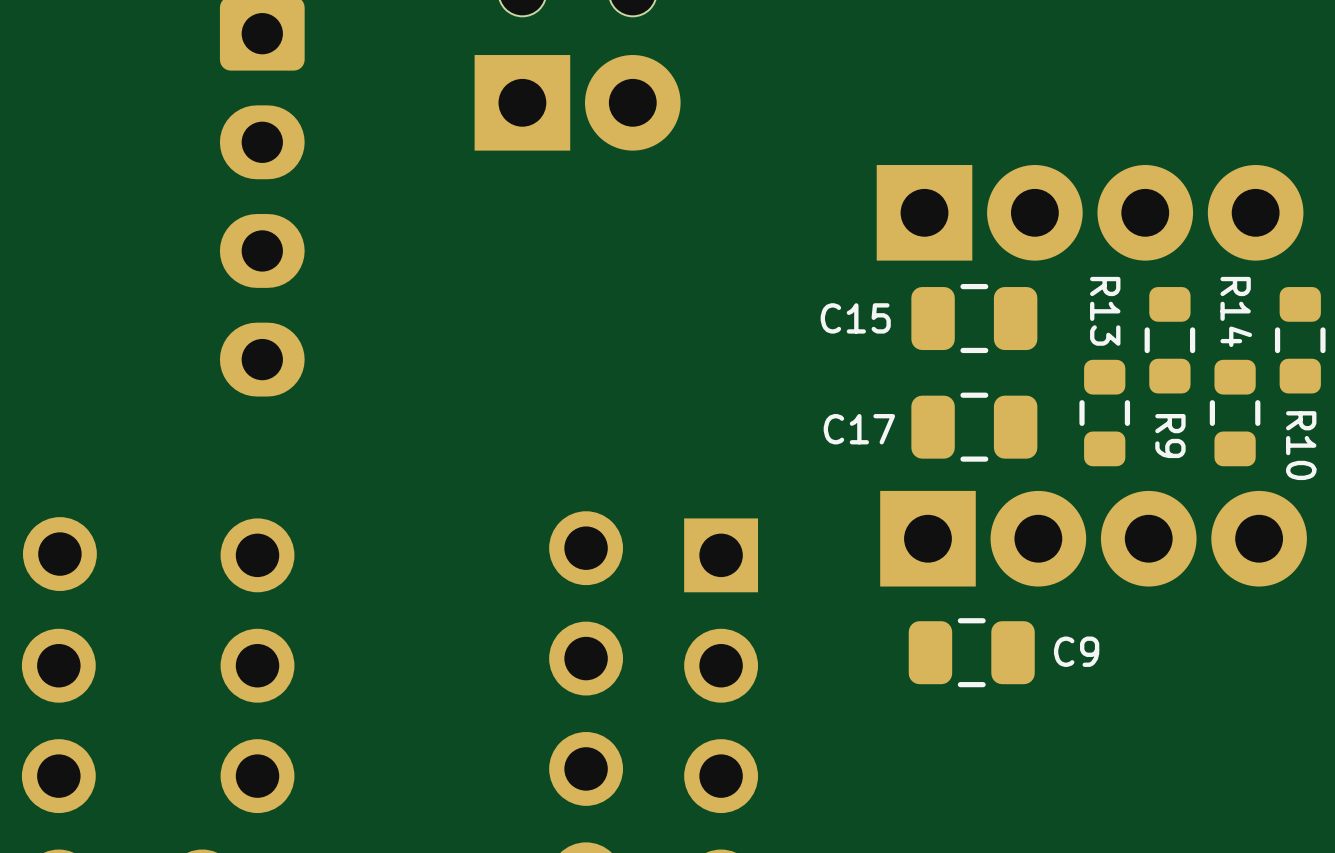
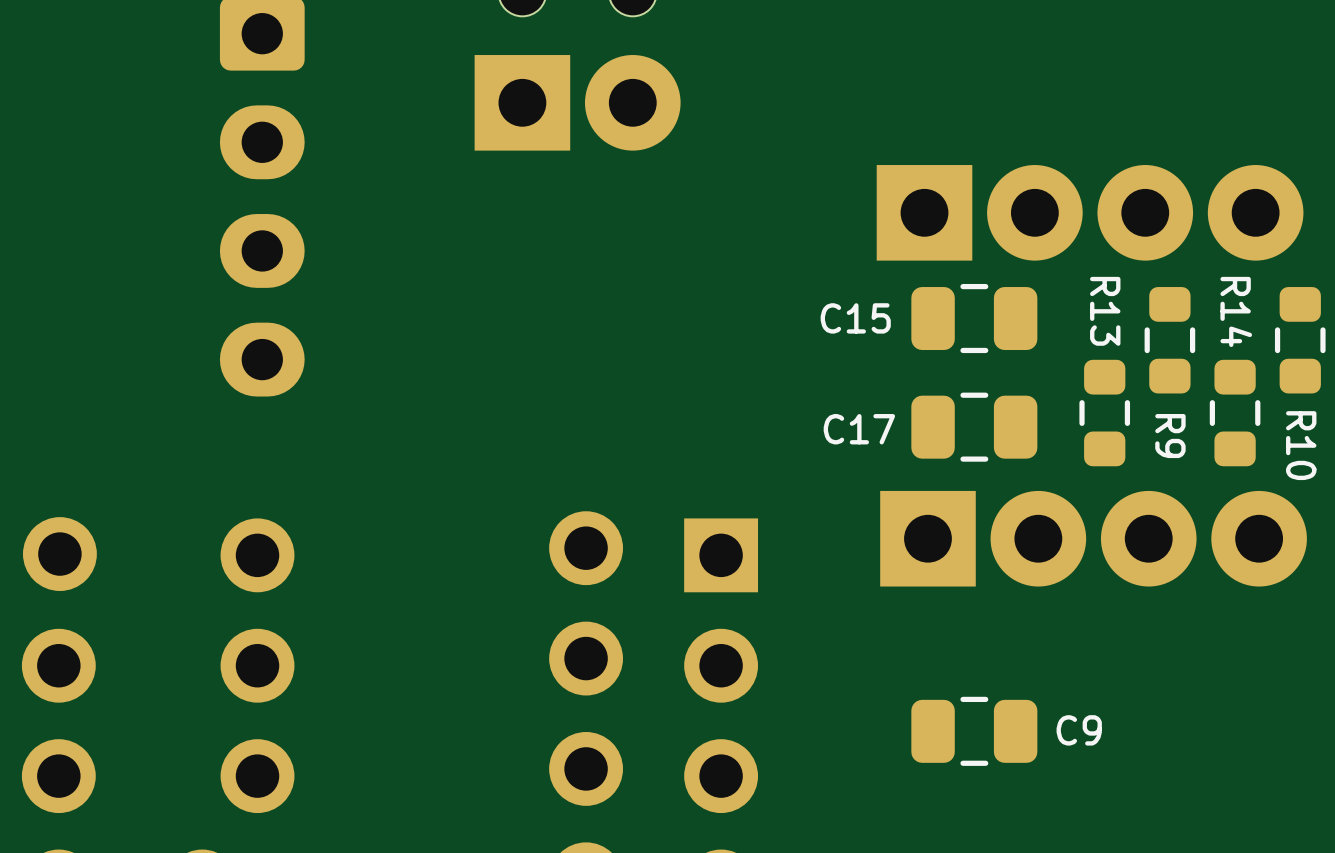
C9 position: (971, 652) -> (974, 731)

